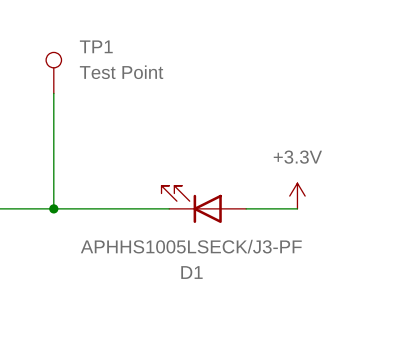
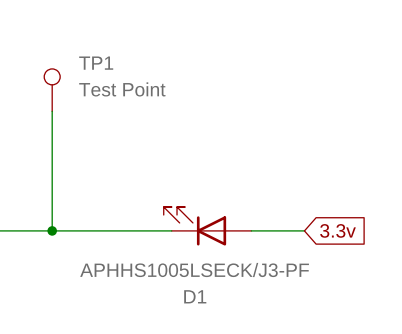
power symbol: +3.3V (297, 196) -> none
global label: none -> 3.3v (337, 230)

